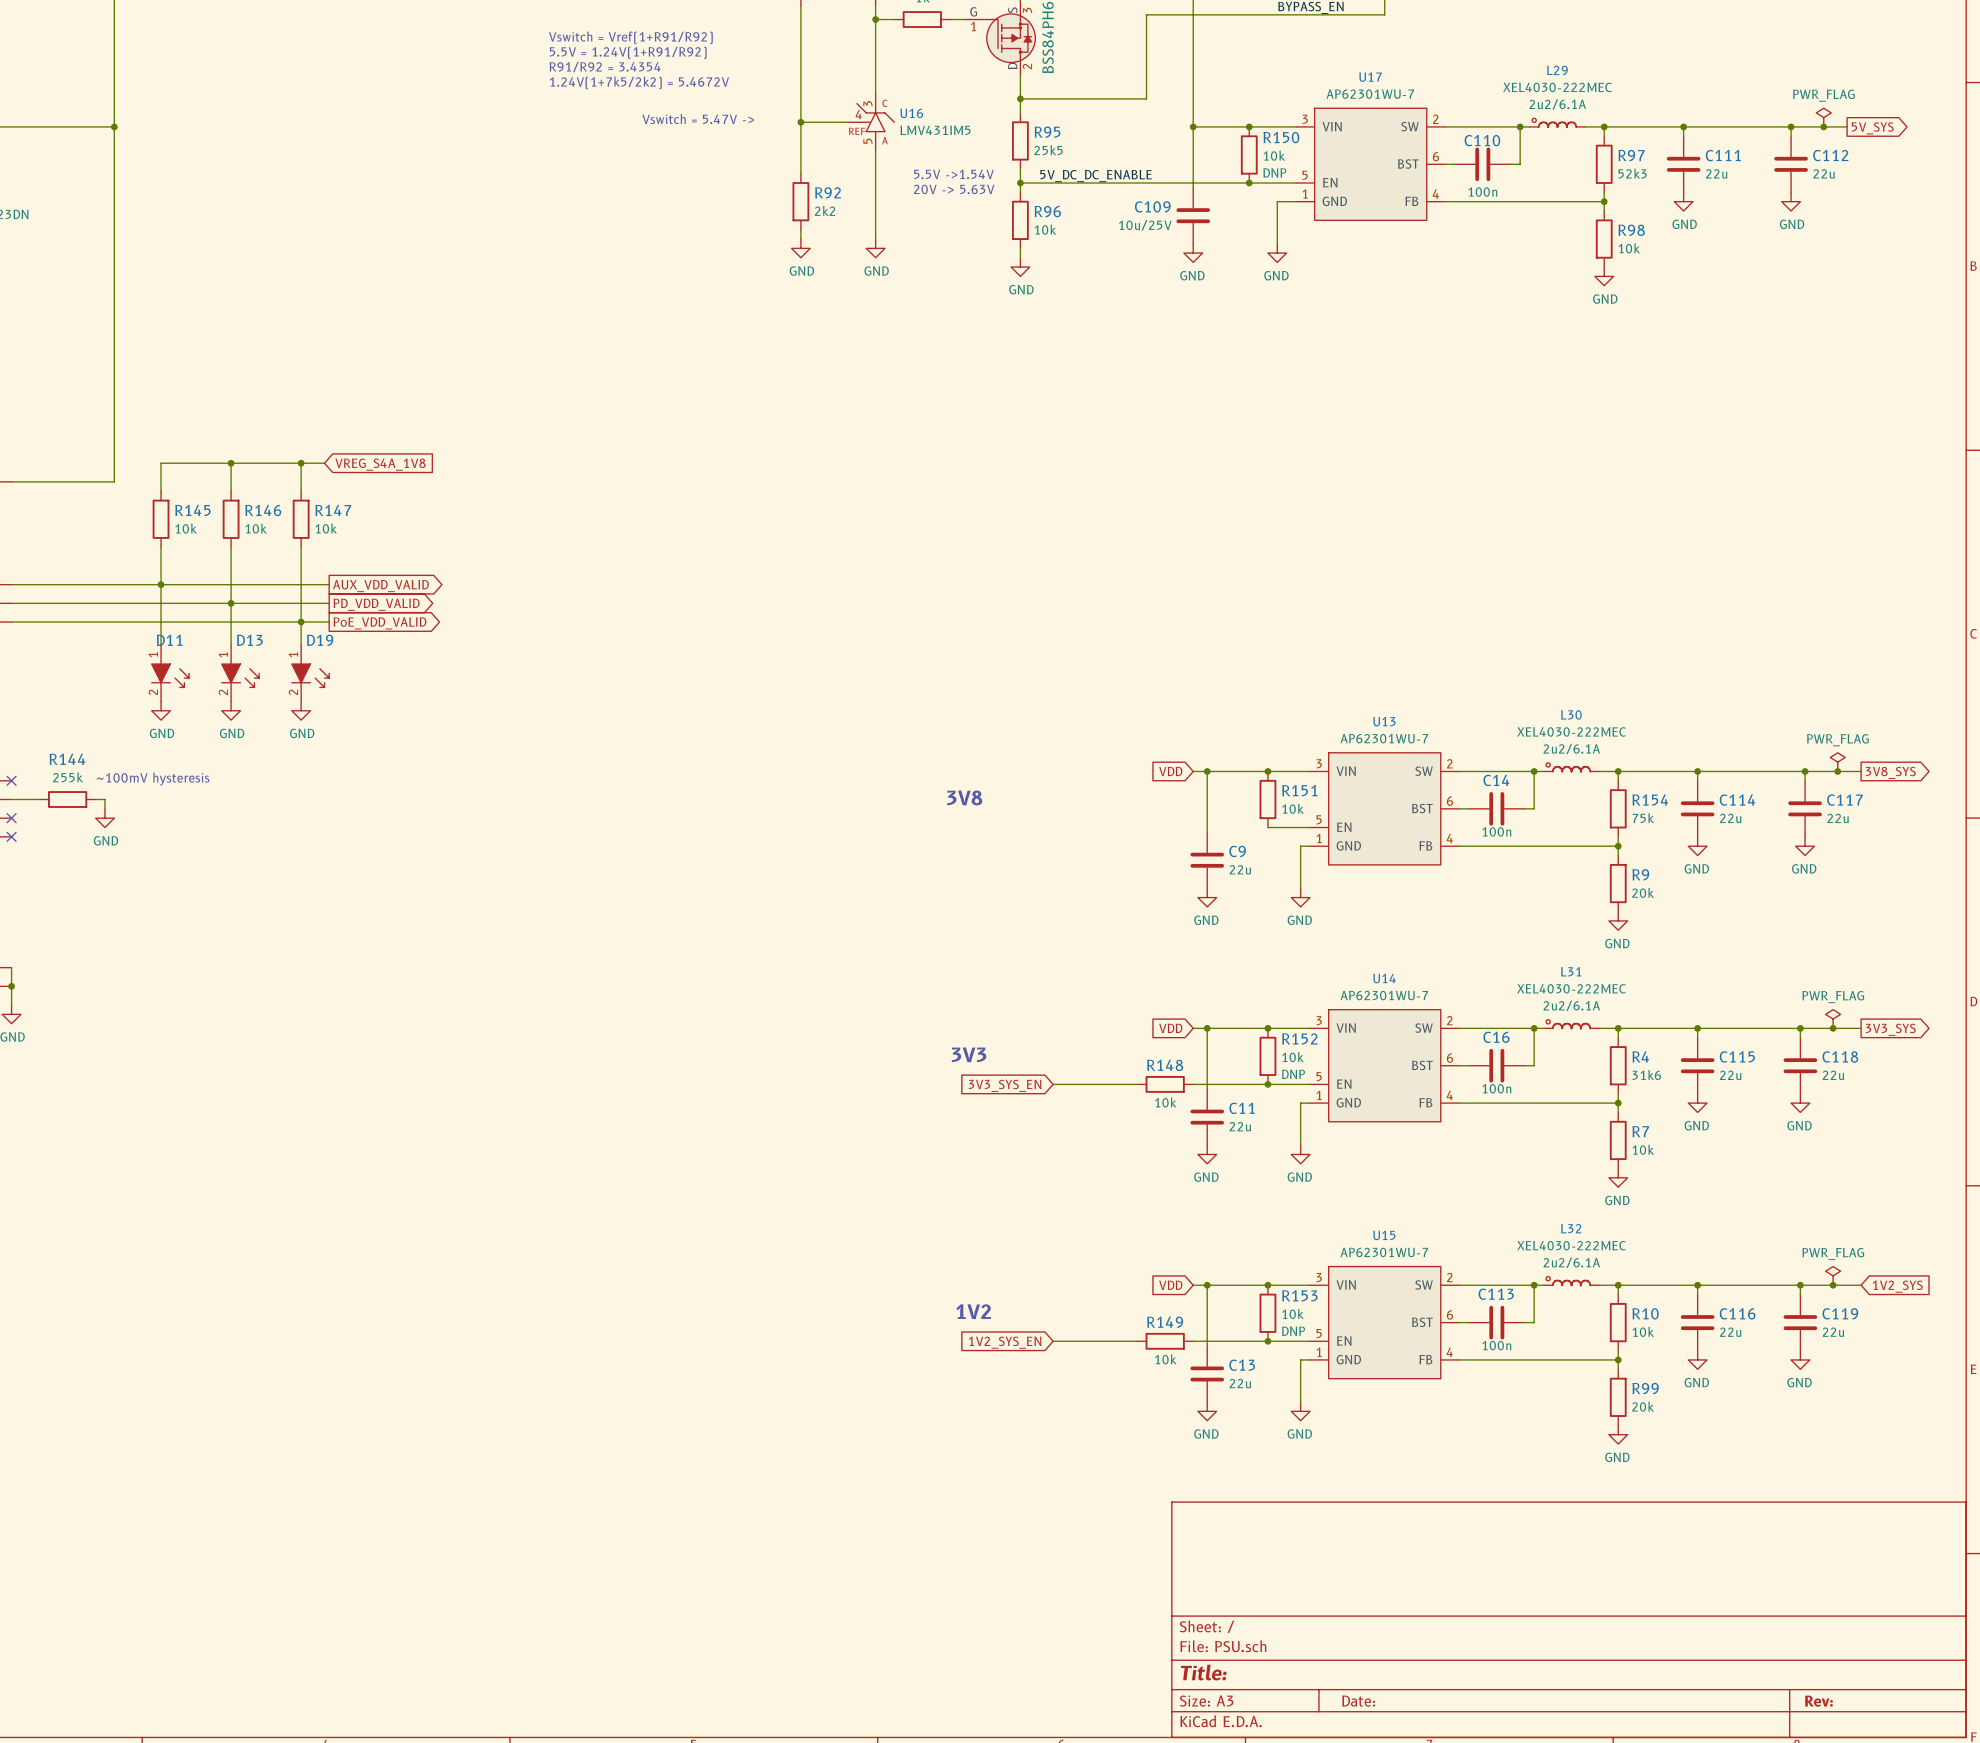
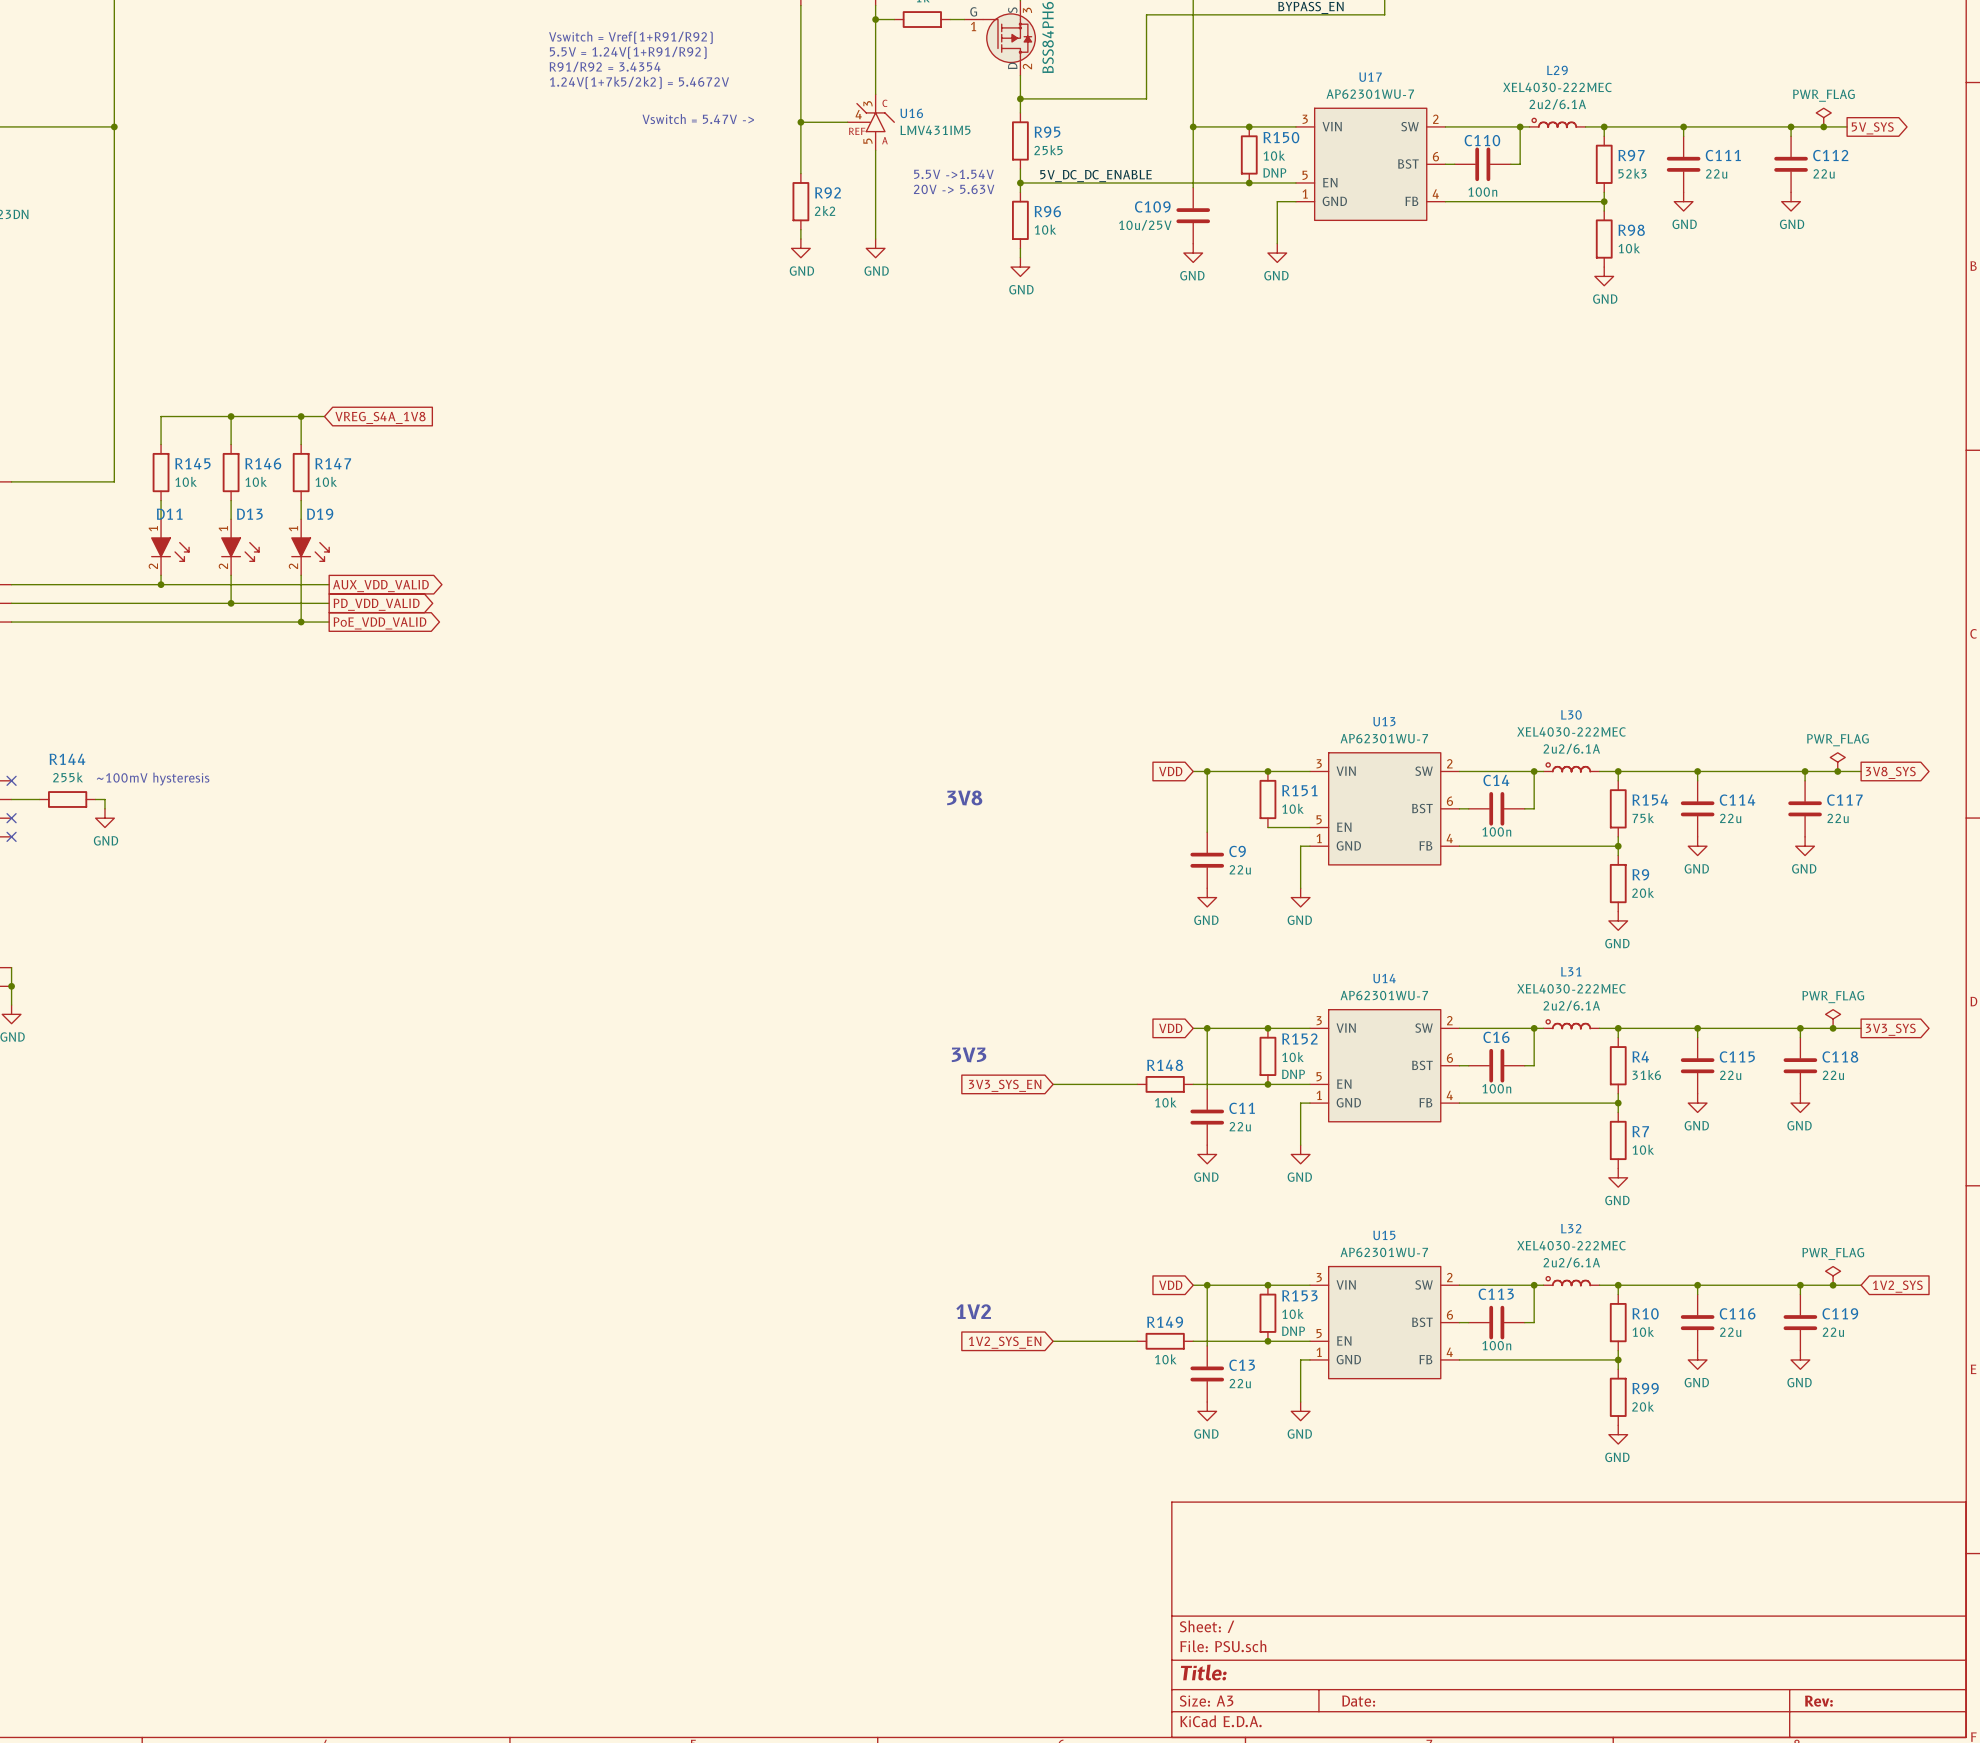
junction: none -> (231, 416)
junction: none -> (301, 416)
wire: (231, 463) (231, 491) -> (231, 416) (231, 444)
junction: (231, 463) -> none
wire: (301, 463) (301, 491) -> (301, 416) (301, 444)
junction: (301, 463) -> none
wire: (324, 463) (161, 463) (161, 491) -> (324, 416) (161, 416) (161, 444)
global label position: VREG_S4A_1V8 (380, 464) -> VREG_S4A_1V8 (380, 417)
wire: none -> (161, 500) (161, 519)
wire: none -> (231, 500) (231, 519)
wire: none -> (301, 500) (301, 519)
R145 position: (161, 519) -> (161, 472)
R146 position: (231, 519) -> (231, 472)
R147 position: (301, 519) -> (301, 472)
wire: (161, 584) (161, 645) -> none
wire: (231, 603) (231, 645) -> none
wire: (301, 622) (301, 645) -> none
D11 position: (170, 673) -> (170, 547)
D13 position: (240, 673) -> (240, 547)
D19 position: (310, 673) -> (310, 547)
power symbol: GND (161, 710) -> none
power symbol: GND (231, 710) -> none
power symbol: GND (301, 710) -> none

